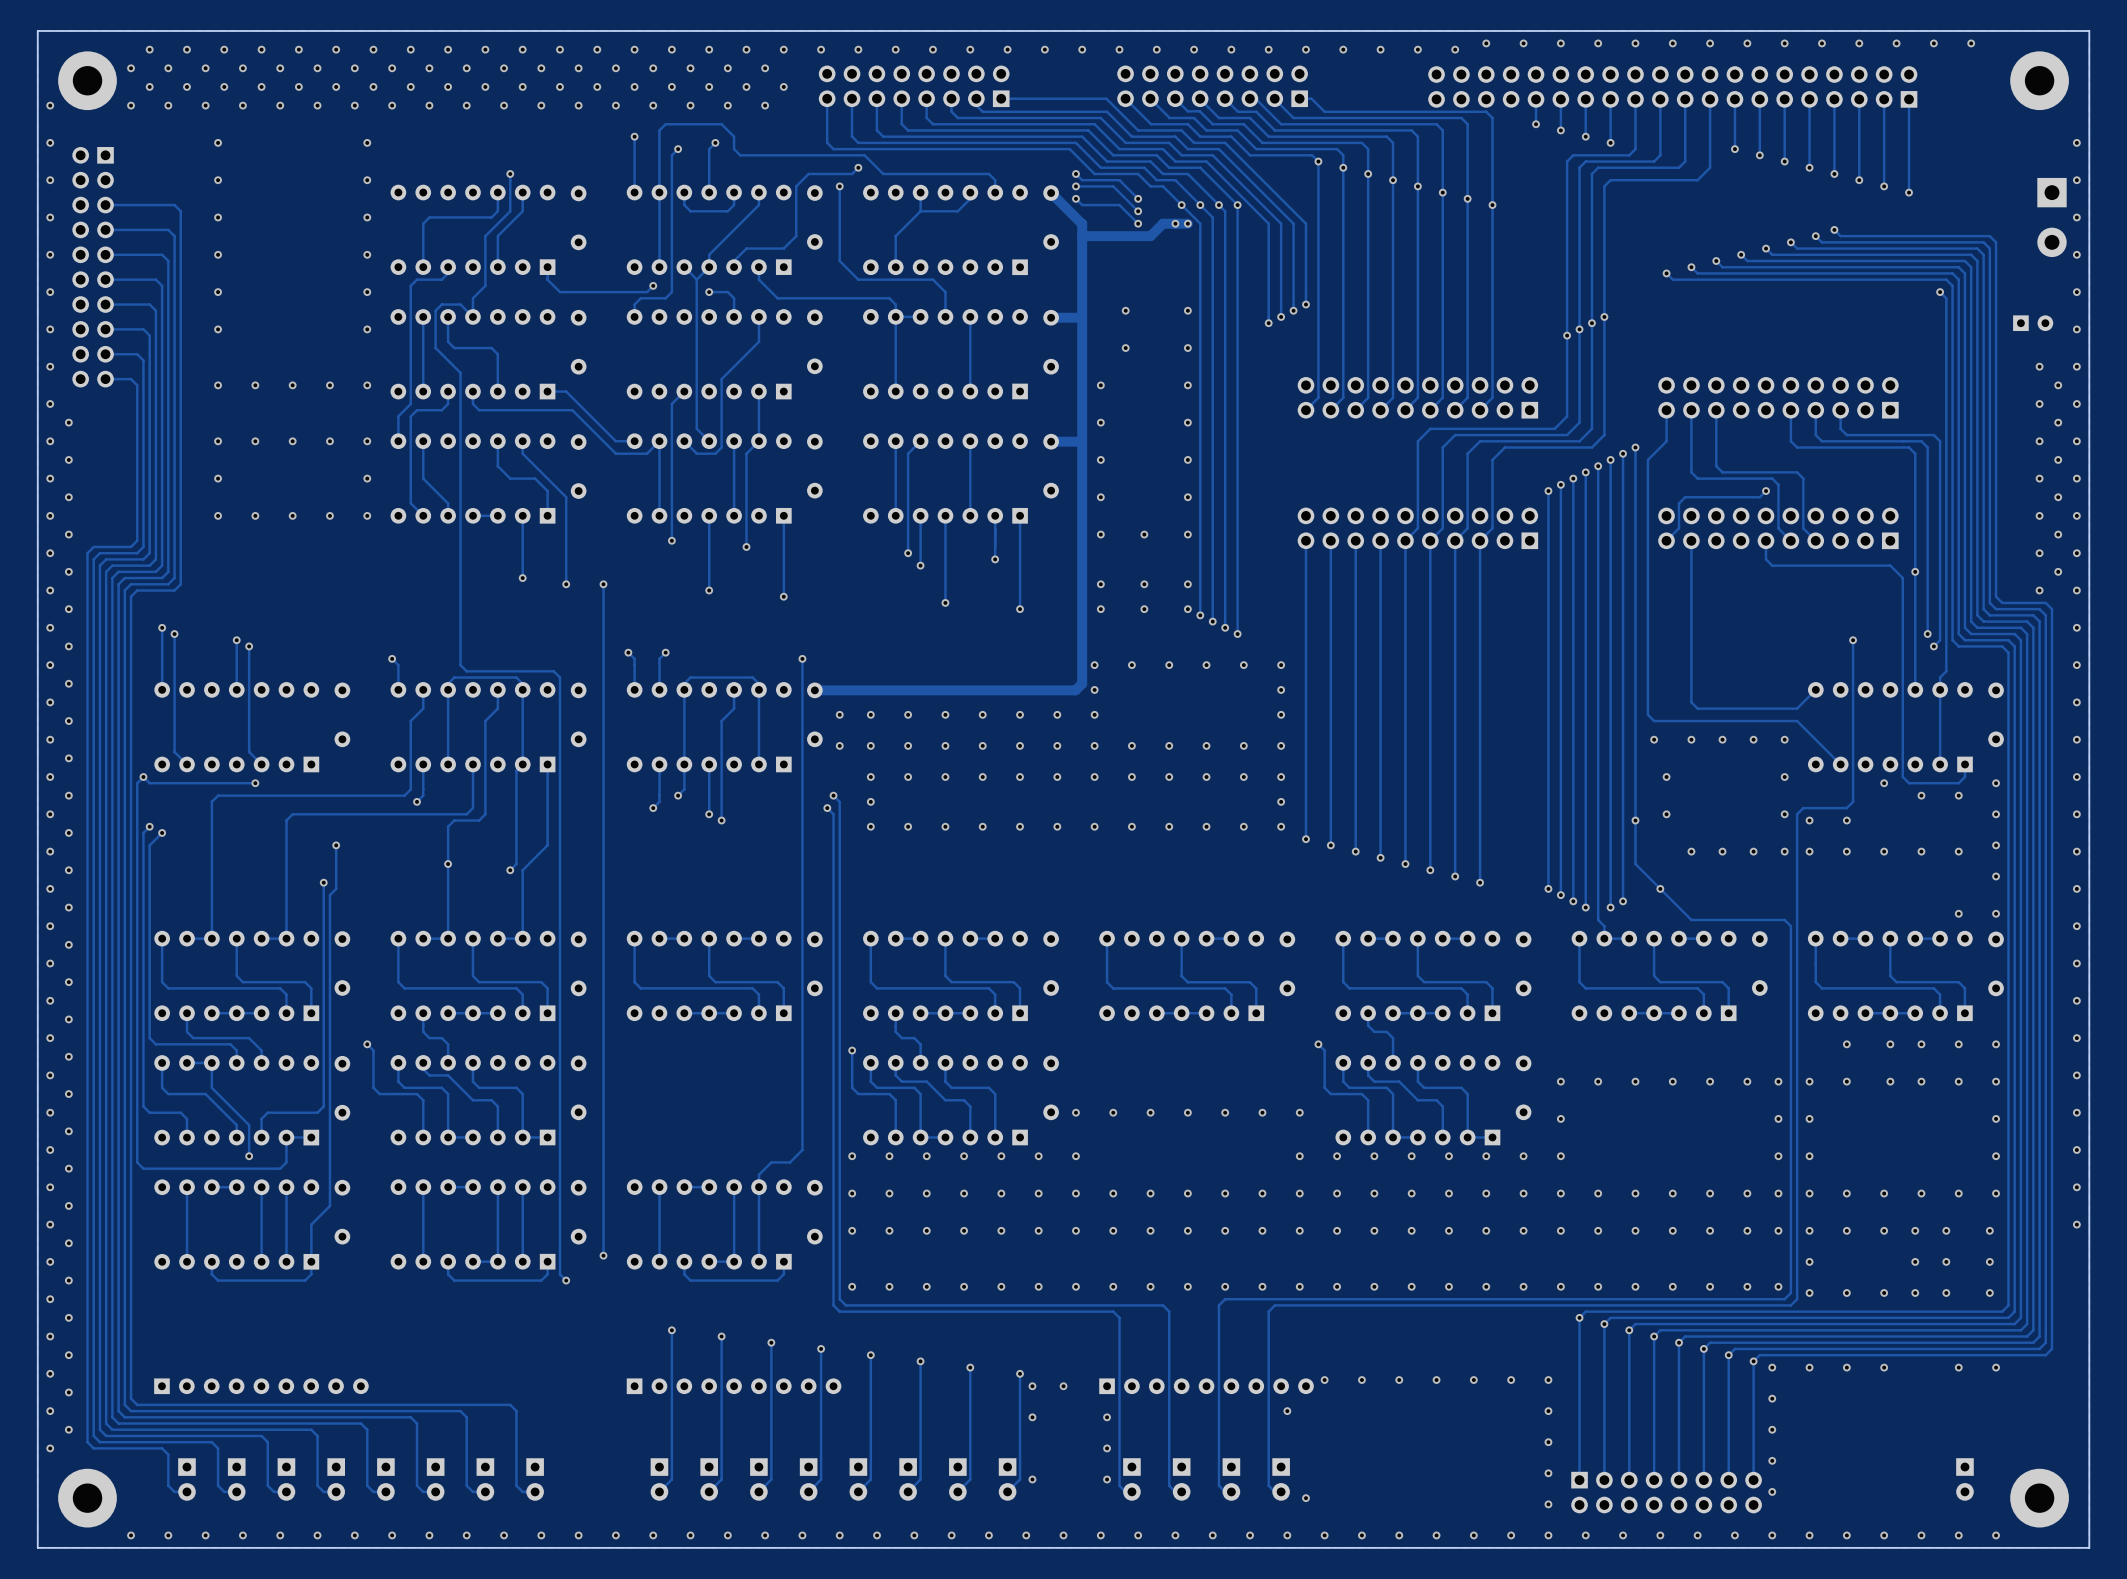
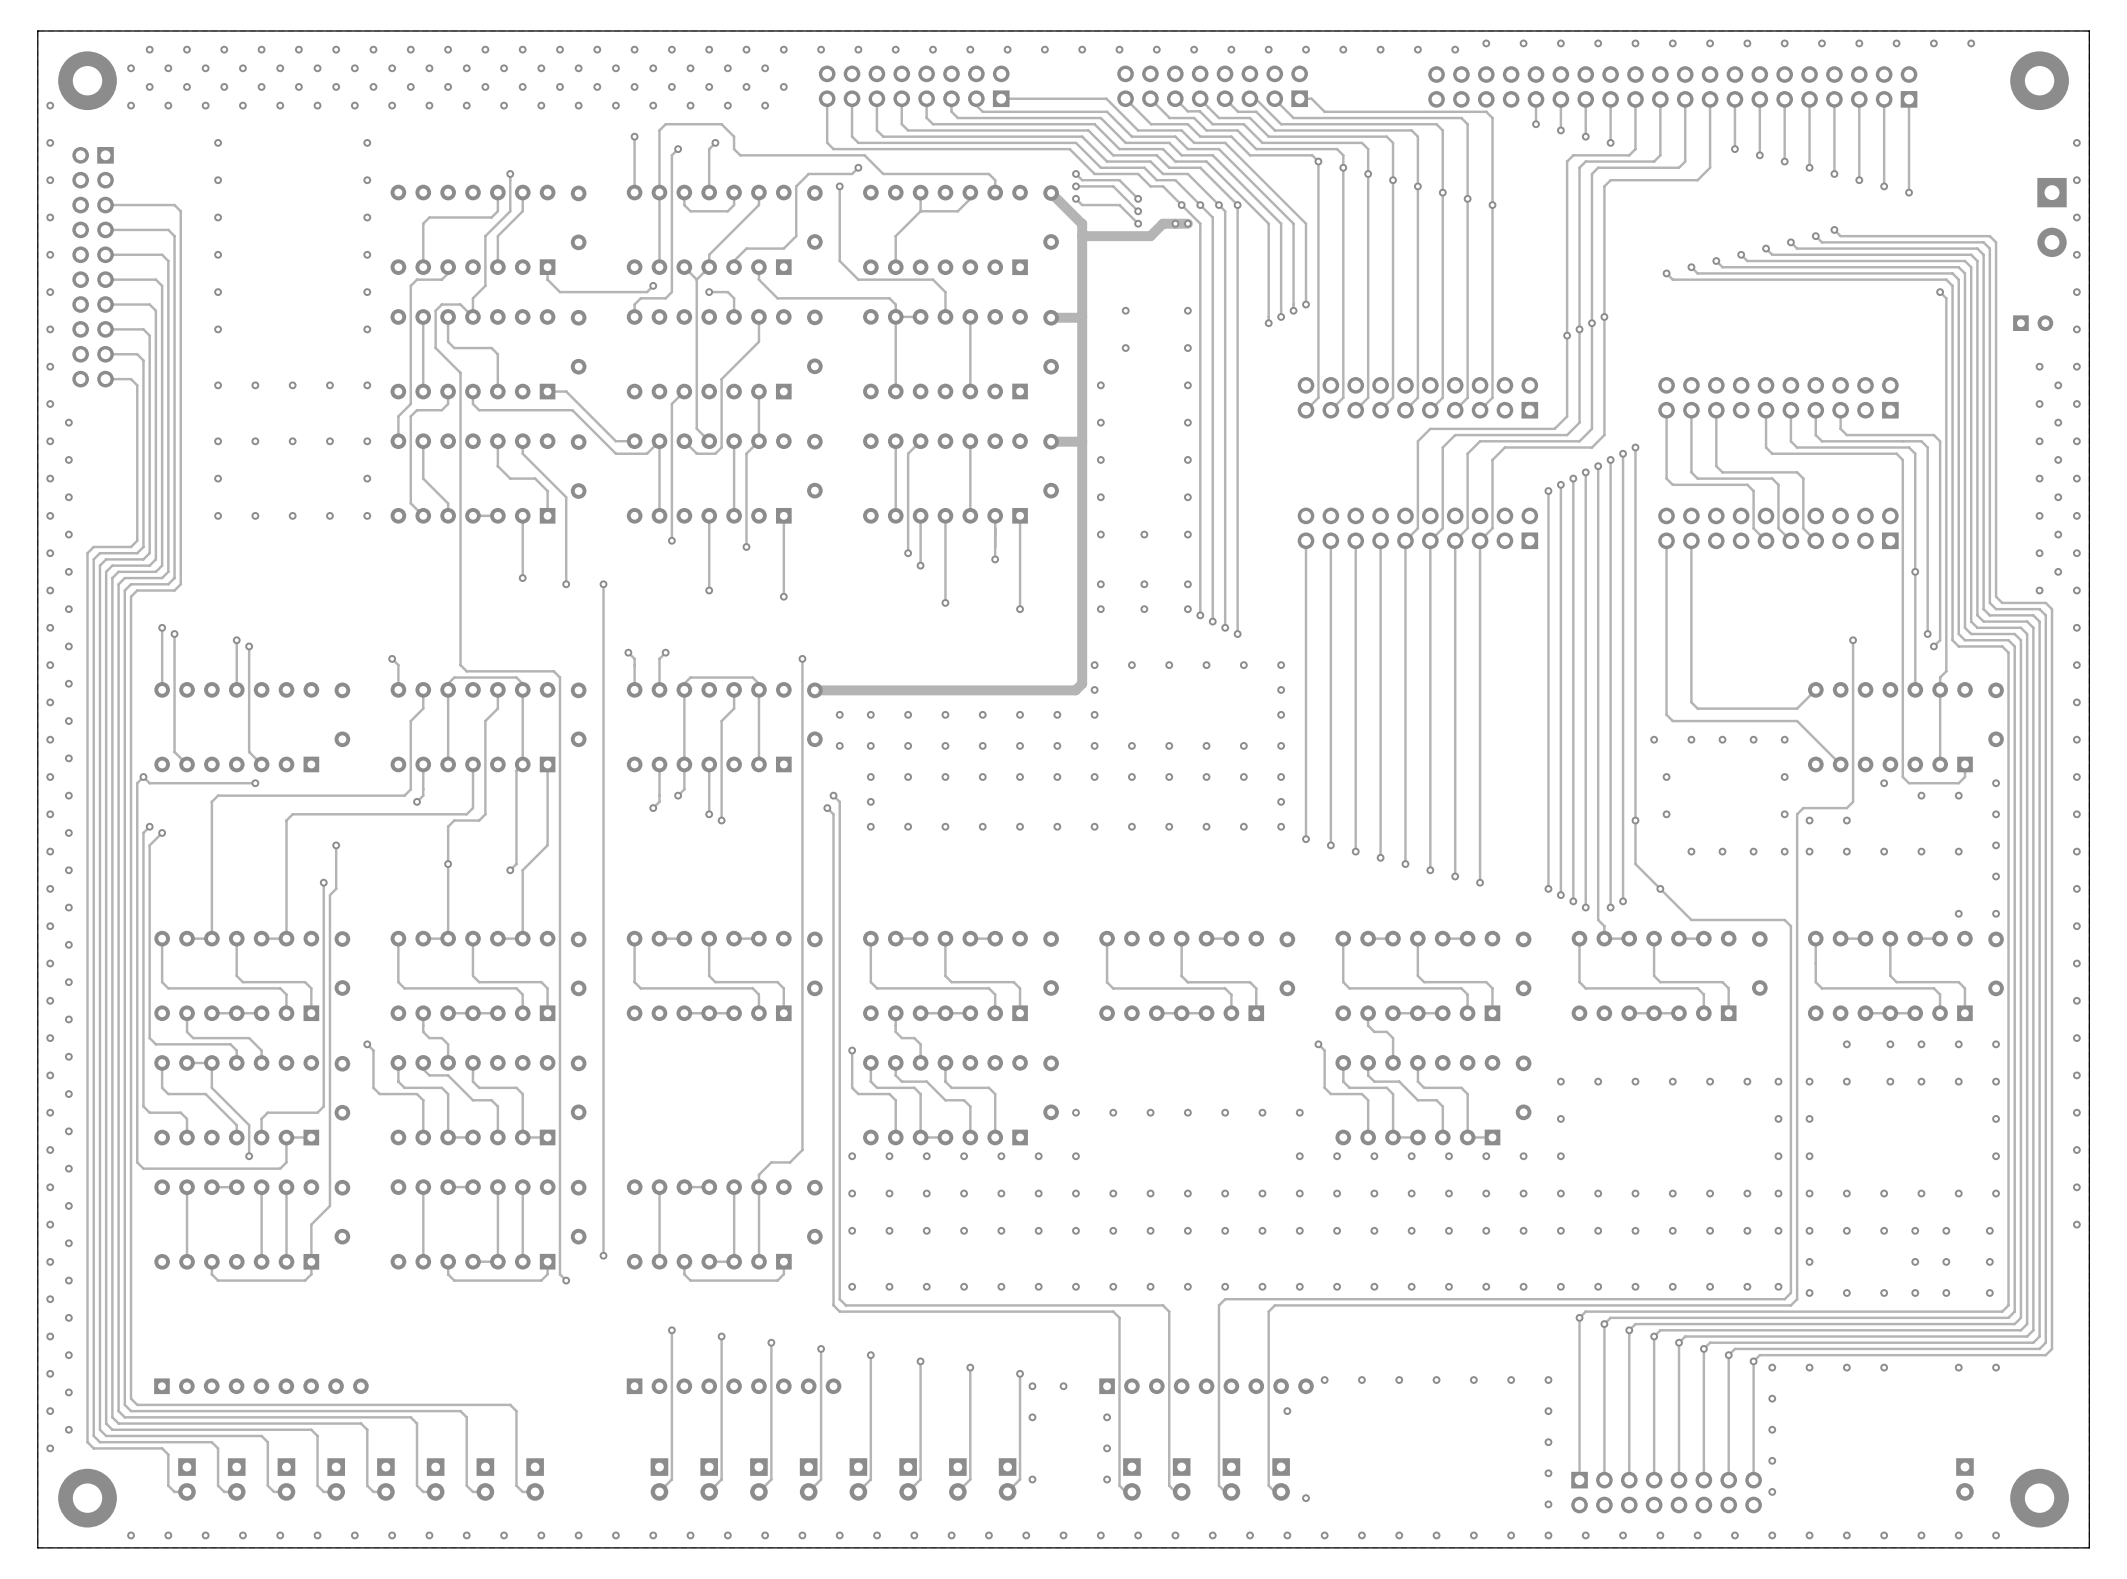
track: (1666, 441) (1647, 459) (1647, 714) (1654, 721) (1672, 721) -> (1666, 540) (1666, 714) (1672, 721)
track: none -> (1666, 441) (1666, 478) (1672, 484) (1747, 484) (1753, 491) (1753, 528) (1765, 540)
track: (1766, 491) (1759, 497) (1685, 497) (1679, 503) (1679, 528) (1669, 537) -> none
via: (1766, 491) -> none
track: (1765, 540) (1765, 559) (1772, 565) (1890, 565) (1902, 578) -> (1766, 410) (1766, 447) (1772, 453) (1896, 453) (1902, 459) (1902, 578)

